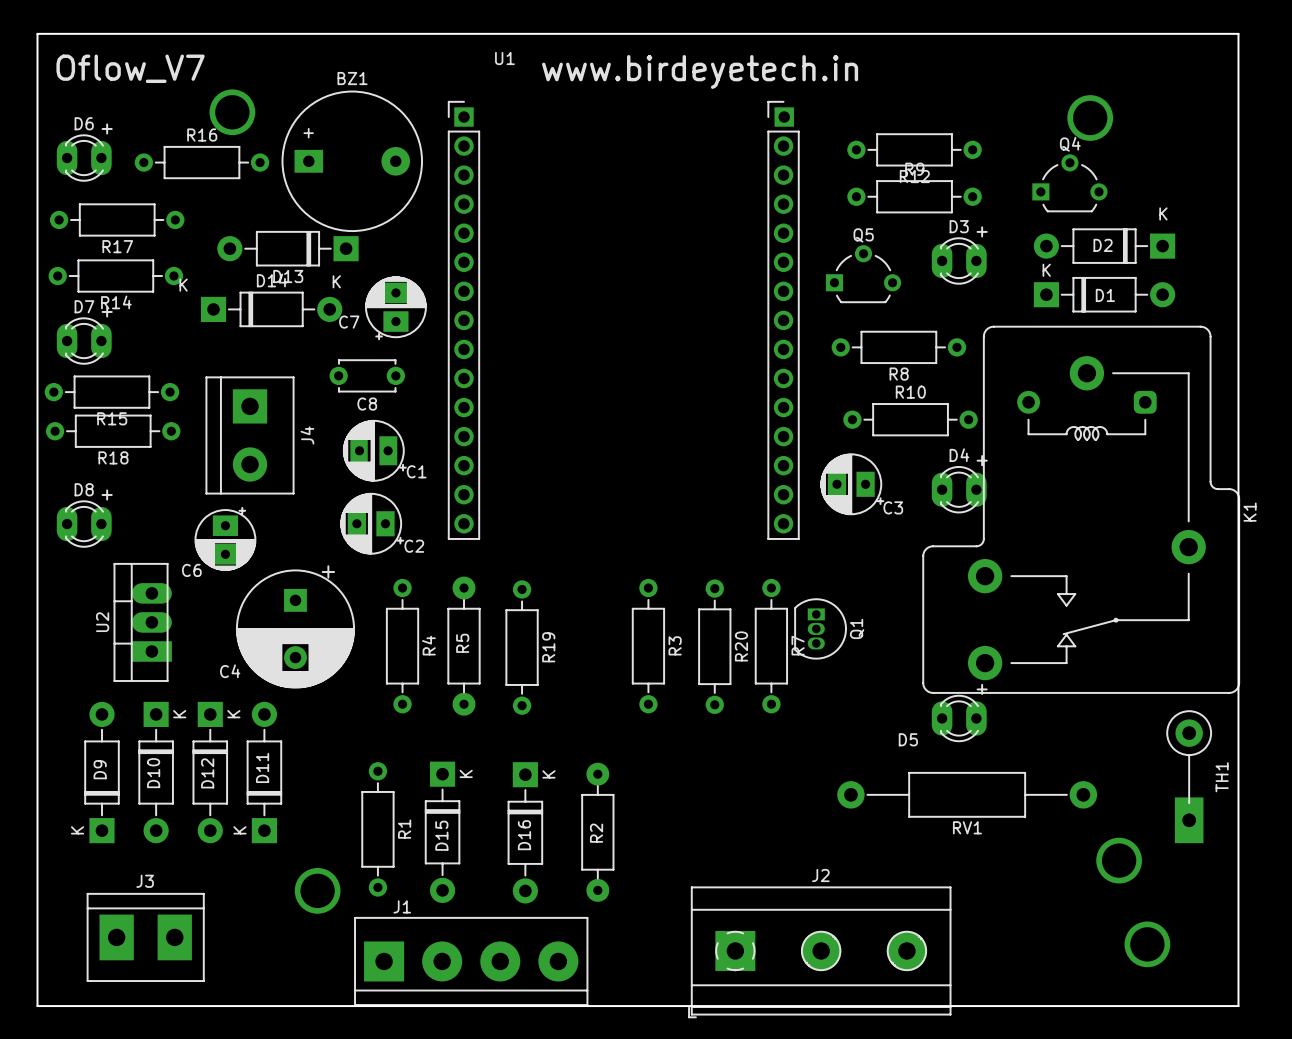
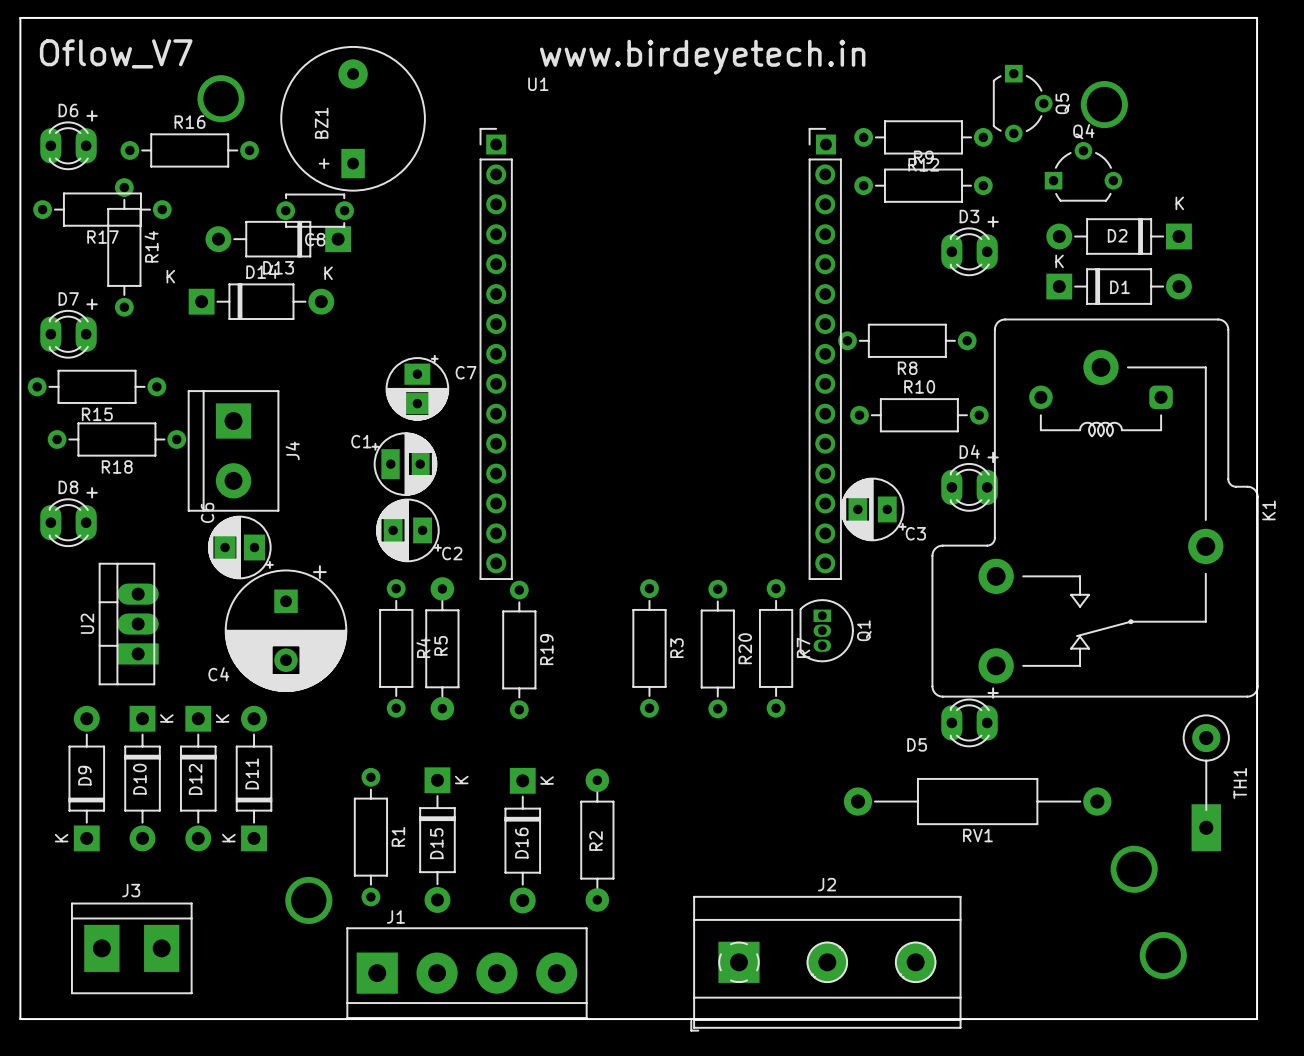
BZ1 name position: BZ1 (352, 78) -> BZ1 (321, 123)
BZ1 rotation: 0° (352, 161) -> 90° counterclockwise (353, 118)
Q5 rotation: 0° (863, 274) -> 90° clockwise (1022, 103)
Q5 position: (863, 274) -> (1022, 103)
R14 rotation: 0° (115, 276) -> 90° clockwise (124, 247)
R14 name position: R14 (116, 302) -> R14 (151, 246)
C7 rotation: 0° (395, 308) -> 180° (417, 387)
C7 position: (395, 308) -> (417, 387)
U1 position: (623, 320) -> (660, 353)
C8 position: (367, 375) -> (315, 210)
R18 position: (113, 431) -> (116, 439)
J4 position: (250, 435) -> (233, 450)
C1 rotation: 0° (374, 450) -> 180° (404, 464)
C1 position: (374, 450) -> (404, 464)
C3 position: (852, 484) -> (873, 509)
C2 position: (372, 523) -> (408, 530)
C6 rotation: 0° (225, 538) -> 90° clockwise (240, 547)
R5 position: (464, 646) -> (442, 648)

